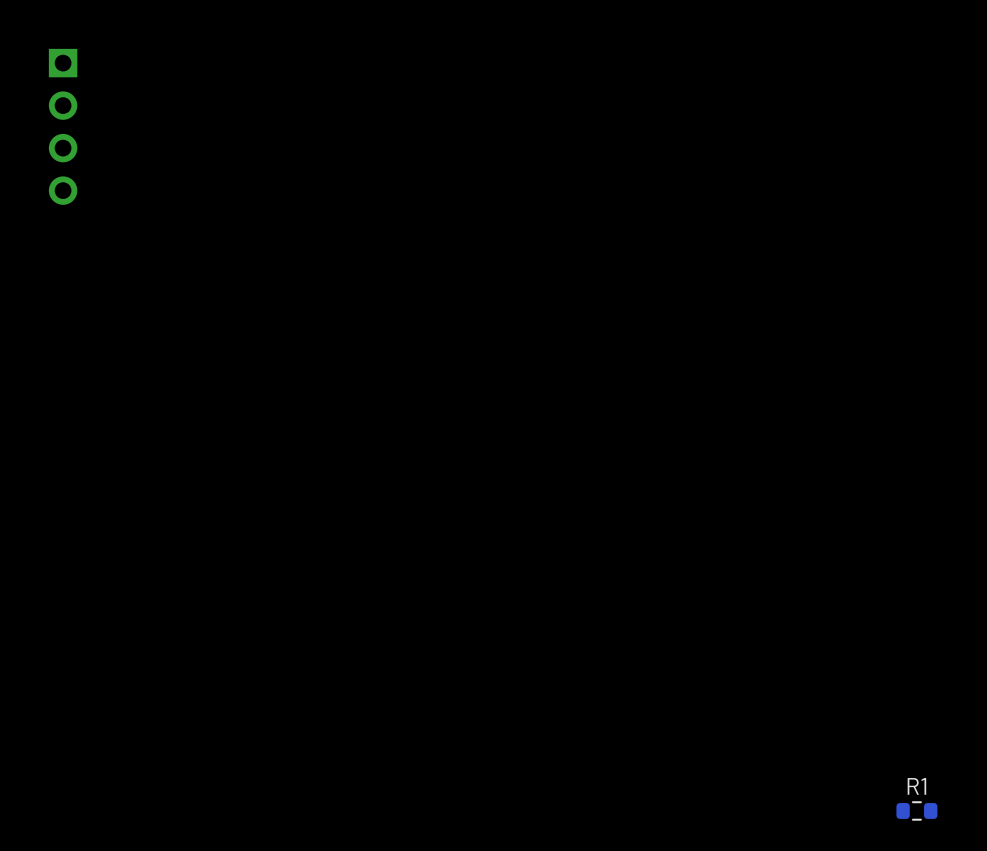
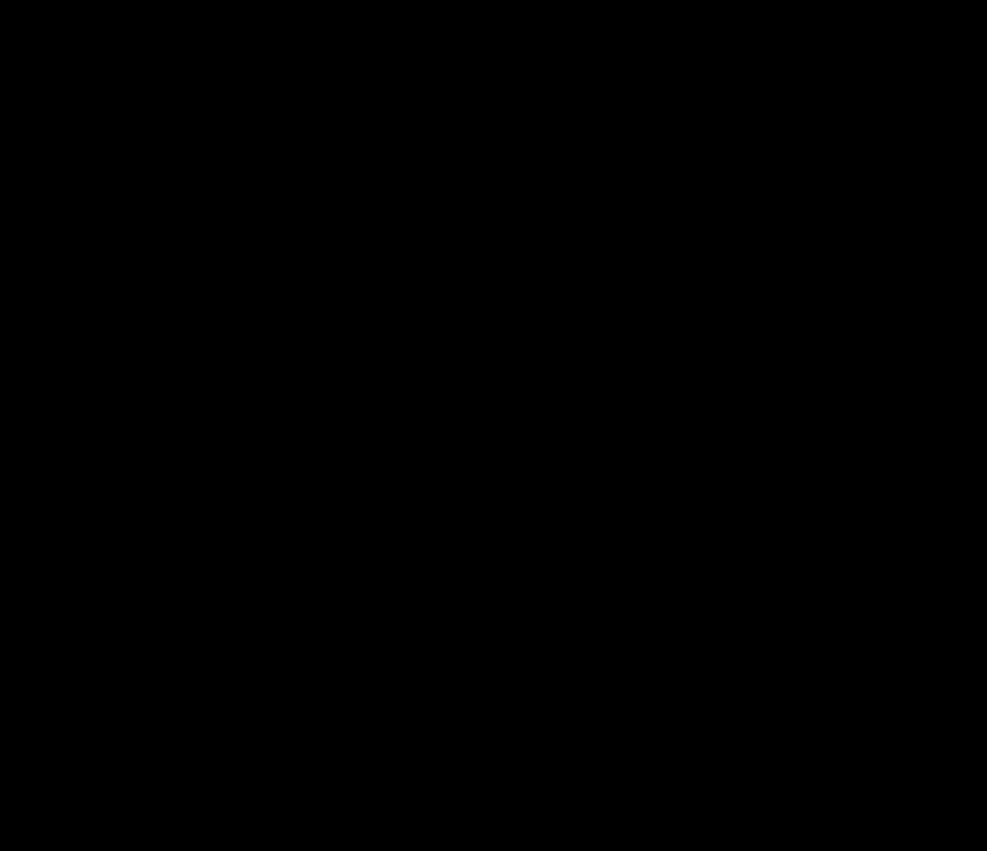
part: (63, 126) -> none
R1: (916, 810) -> none

